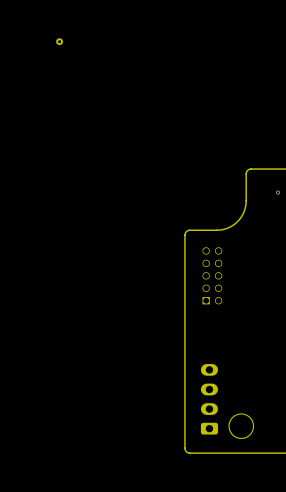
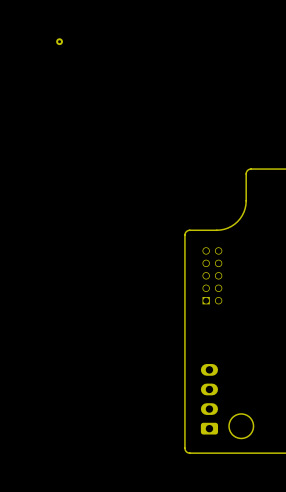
via: (278, 192) -> none

